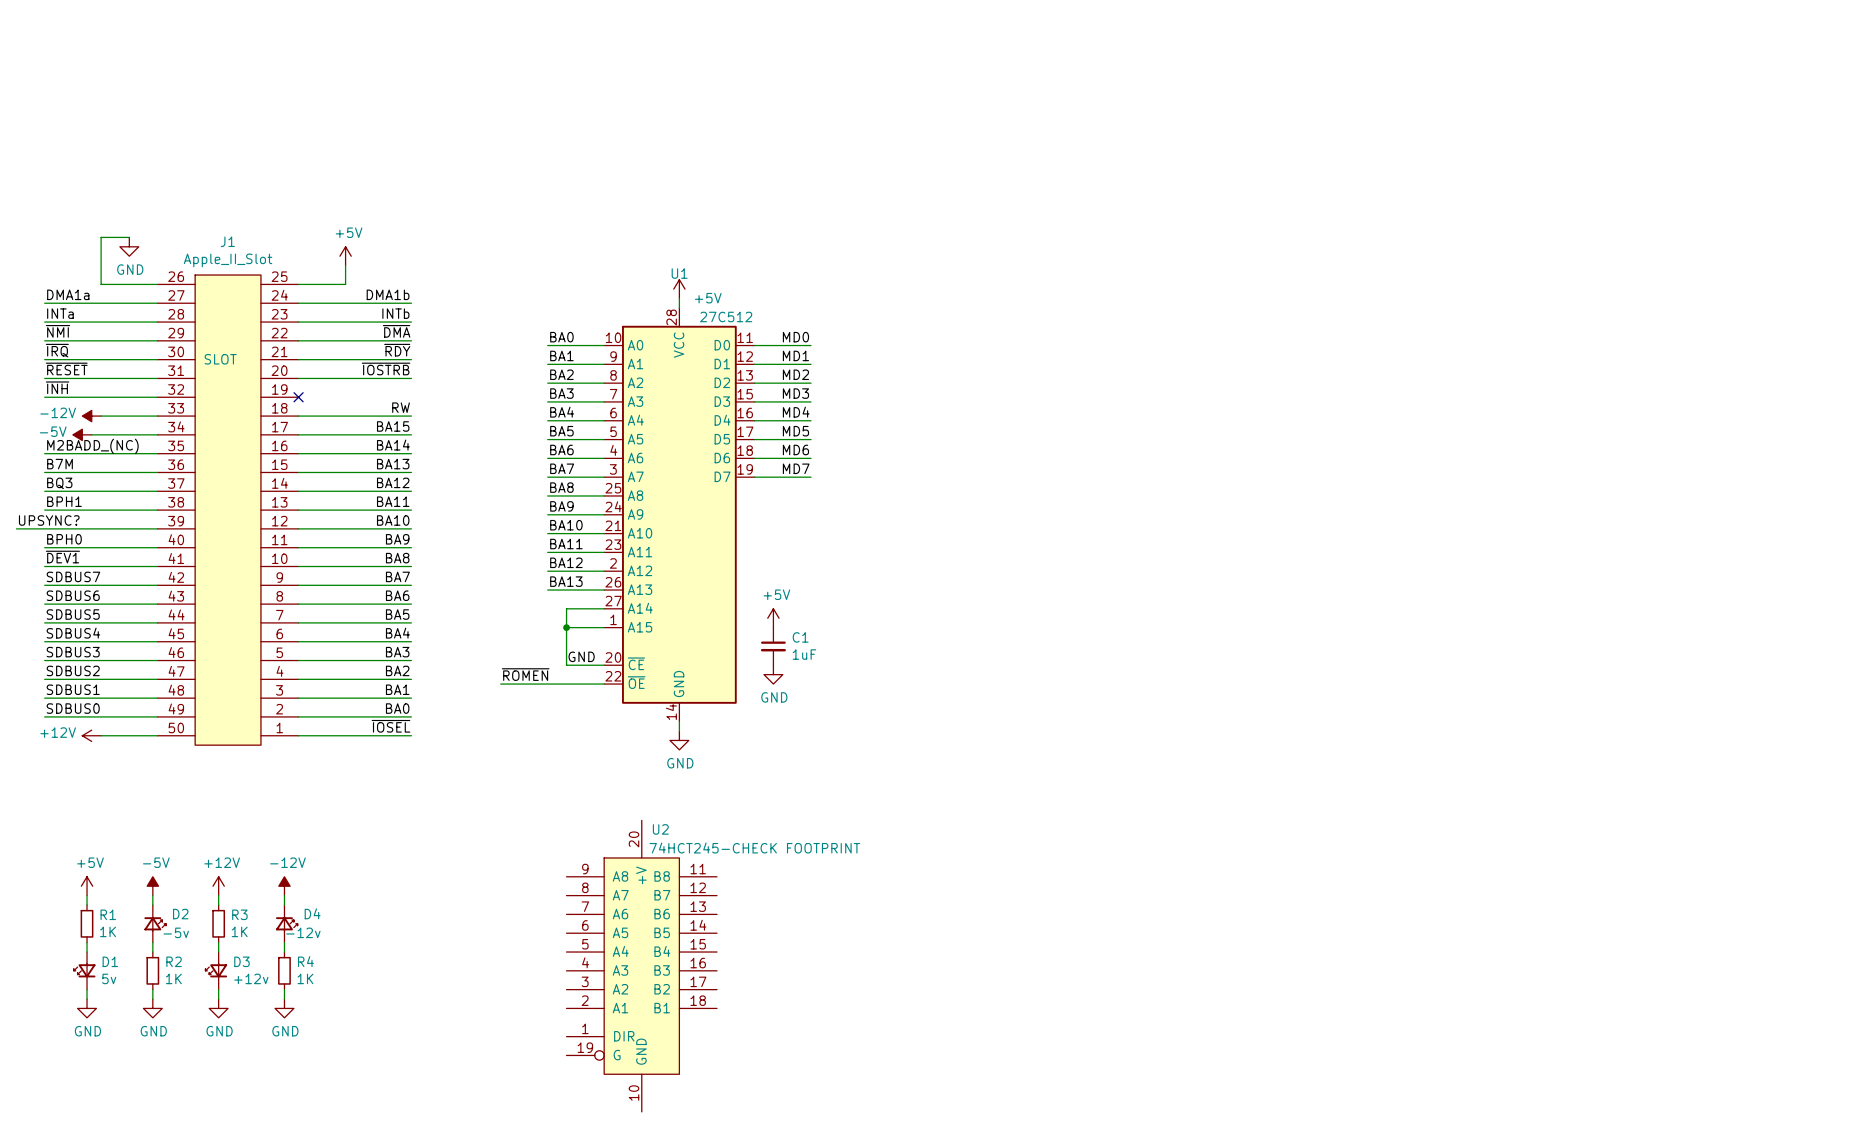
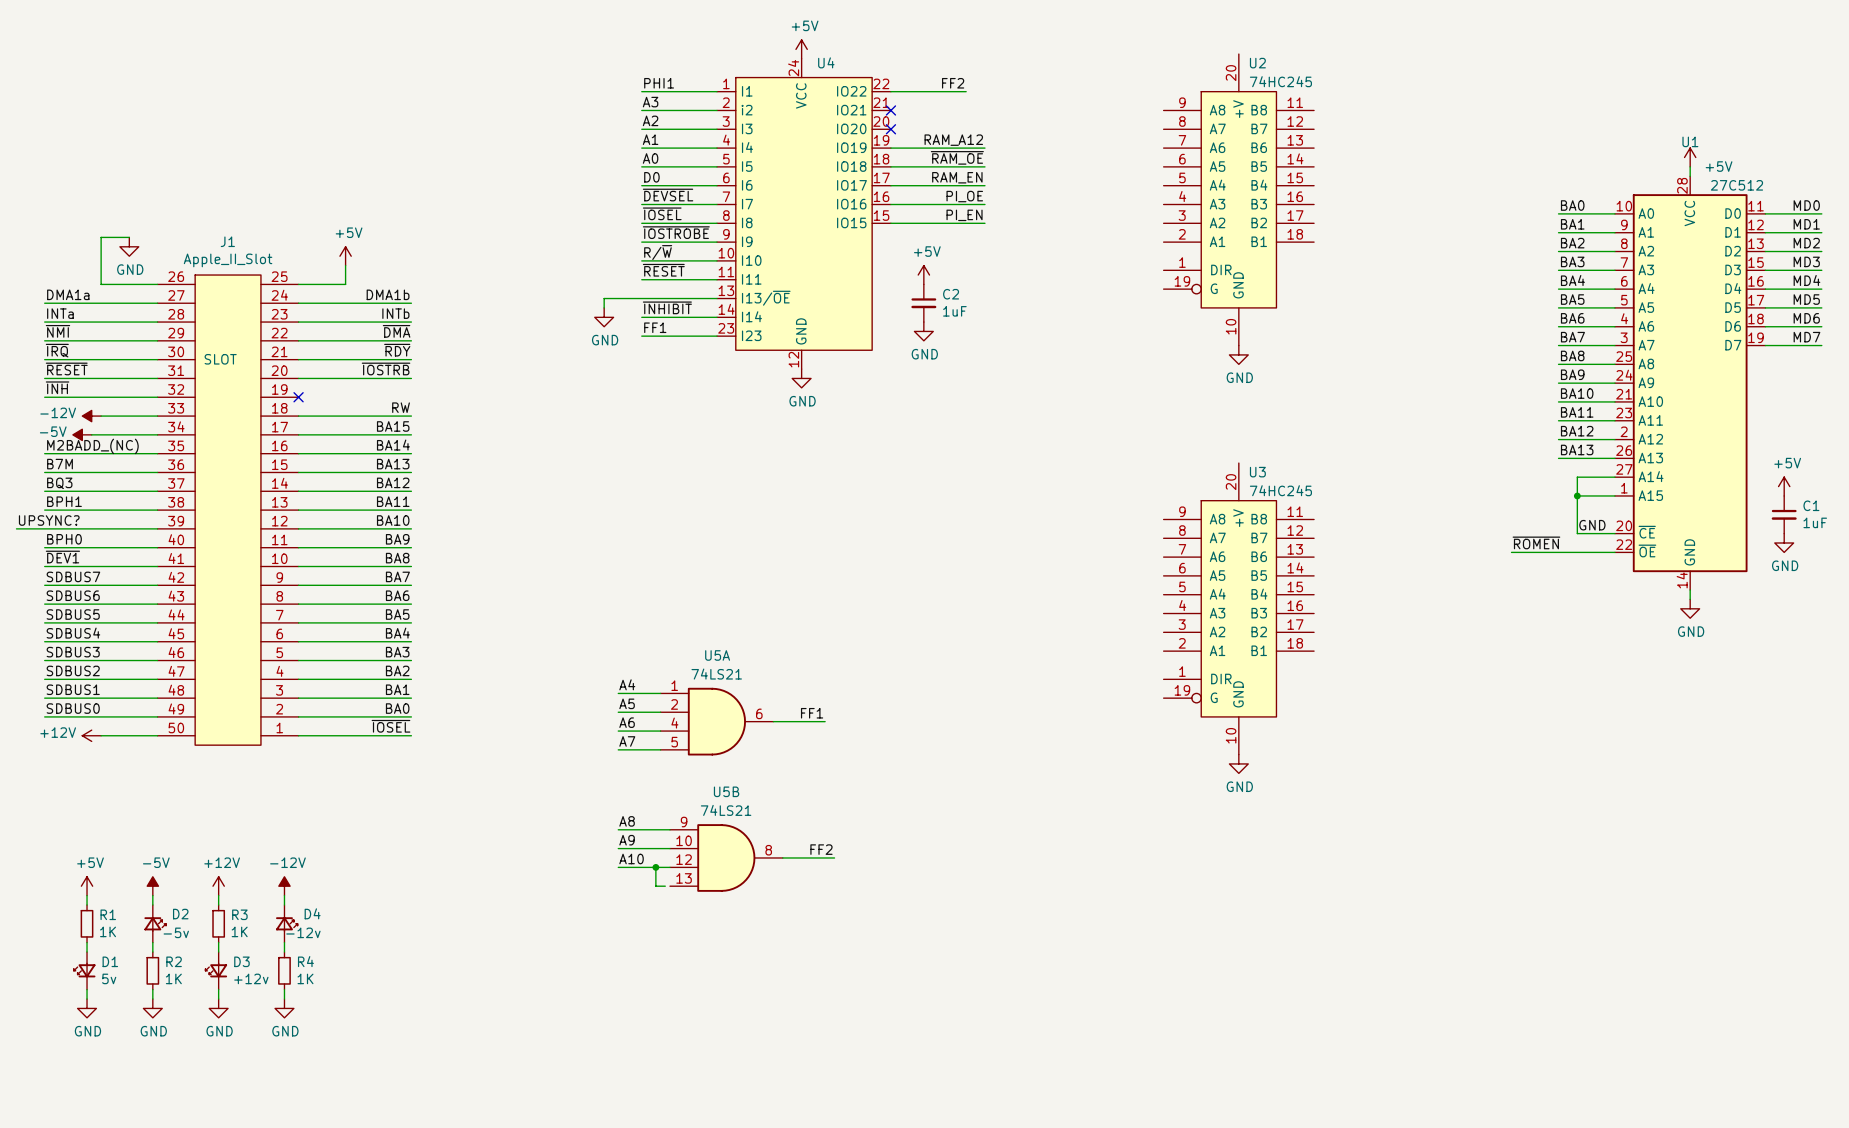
power symbol: none -> +5V (801, 49)
label: none -> PHI1 (659, 83)
label: none -> FF2 (953, 83)
wire: none -> (641, 91) (716, 91)
wire: none -> (890, 91) (966, 91)
label: none -> A3 (650, 102)
wire: none -> (641, 110) (716, 110)
no-connect mark: none -> (890, 110)
label: none -> A2 (650, 120)
wire: none -> (641, 129) (716, 129)
no-connect mark: none -> (890, 129)
label: none -> A1 (650, 139)
label: none -> RAM_A12 (953, 140)
wire: none -> (641, 148) (716, 148)
wire: none -> (890, 148) (984, 148)
label: none -> ~{RAM_OE} (957, 157)
power symbol: none -> +5V (1690, 157)
label: none -> A0 (650, 158)
wire: none -> (641, 166) (716, 166)
wire: none -> (890, 166) (984, 166)
wire: none -> (1690, 166) (1690, 176)
label: none -> D0 (651, 177)
label: none -> RAM_EN (957, 177)
wire: none -> (641, 185) (716, 185)
wire: none -> (890, 185) (984, 185)
label: none -> ~{DEVSEL} (668, 195)
label: none -> PI_OE (964, 196)
wire: none -> (641, 204) (716, 204)
wire: none -> (890, 204) (984, 204)
label: none -> BA0 (1572, 205)
label: none -> MD0 (1806, 205)
label: none -> ~{IOSEL} (662, 213)
U4: none -> (803, 213)
wire: none -> (1558, 213) (1614, 213)
wire: none -> (1765, 213) (1821, 213)
label: none -> PI_EN (964, 215)
wire: none -> (641, 223) (716, 223)
wire: none -> (890, 223) (984, 223)
label: none -> BA1 (1572, 224)
label: none -> MD1 (1806, 224)
label: none -> ~{IOSTROBE} (676, 232)
wire: none -> (1558, 232) (1614, 232)
wire: none -> (1765, 232) (1821, 232)
wire: none -> (641, 242) (716, 242)
label: none -> BA2 (1572, 243)
label: none -> MD2 (1806, 243)
wire: none -> (1558, 251) (1614, 251)
wire: none -> (1765, 251) (1821, 251)
label: none -> R/~{W} (658, 252)
wire: none -> (641, 260) (716, 260)
label: none -> BA3 (1572, 261)
label: none -> MD3 (1806, 261)
label: none -> ~{RESET} (663, 270)
wire: none -> (1558, 270) (1614, 270)
wire: none -> (1765, 270) (1821, 270)
power symbol: none -> +5V (923, 275)
wire: none -> (641, 279) (716, 279)
label: none -> BA4 (1572, 280)
label: none -> MD4 (1806, 280)
power symbol: +5V (679, 289) -> none
wire: none -> (1558, 289) (1614, 289)
wire: none -> (1765, 289) (1821, 289)
wire: (679, 298) (679, 307) -> none
wire: none -> (716, 298) (604, 298) (604, 307)
label: none -> BA5 (1572, 299)
label: none -> MD5 (1806, 299)
C2: none -> 1uF (923, 303)
label: none -> ~{INHIBIT} (667, 307)
wire: none -> (1558, 307) (1614, 307)
wire: none -> (1765, 307) (1821, 307)
power symbol: none -> GND (604, 317)
wire: none -> (641, 317) (716, 317)
label: none -> BA6 (1572, 318)
label: none -> MD6 (1806, 318)
wire: none -> (1558, 326) (1614, 326)
wire: none -> (1765, 326) (1821, 326)
label: none -> FF1 (655, 327)
power symbol: none -> GND (923, 331)
label: BA0 (561, 337) -> none
label: MD0 (795, 337) -> none
label: none -> BA7 (1572, 337)
label: none -> MD7 (1806, 337)
wire: (547, 345) (604, 345) -> none
wire: none -> (1558, 345) (1614, 345)
wire: none -> (1765, 345) (1821, 345)
power symbol: none -> GND (1238, 354)
label: BA1 (561, 355) -> none
label: MD1 (795, 355) -> none
label: none -> BA8 (1572, 355)
wire: (547, 364) (604, 364) -> none
wire: (754, 364) (811, 364) -> none
wire: none -> (1558, 364) (1614, 364)
label: BA2 (561, 374) -> none
label: MD2 (795, 374) -> none
label: none -> BA9 (1572, 374)
power symbol: none -> GND (801, 378)
wire: (547, 383) (604, 383) -> none
wire: (754, 383) (811, 383) -> none
wire: none -> (1558, 383) (1614, 383)
label: BA3 (561, 393) -> none
label: MD3 (795, 393) -> none
label: none -> BA10 (1577, 393)
wire: (547, 401) (604, 401) -> none
wire: (754, 401) (811, 401) -> none
wire: none -> (1558, 401) (1614, 401)
label: BA4 (562, 412) -> none
label: MD4 (796, 412) -> none
label: none -> BA11 (1577, 412)
wire: (547, 420) (604, 420) -> none
wire: (754, 420) (811, 420) -> none
wire: none -> (1558, 420) (1614, 420)
label: BA5 (561, 431) -> none
label: MD5 (795, 431) -> none
label: none -> BA12 (1577, 431)
wire: (547, 439) (604, 439) -> none
wire: (754, 439) (811, 439) -> none
wire: none -> (1558, 439) (1614, 439)
label: BA6 (561, 449) -> none
label: MD6 (795, 449) -> none
label: none -> BA13 (1577, 449)
wire: (547, 458) (604, 458) -> none
wire: (754, 458) (811, 458) -> none
wire: none -> (1558, 458) (1614, 458)
label: BA7 (562, 468) -> none
label: MD7 (796, 468) -> none
wire: (547, 477) (604, 477) -> none
wire: (754, 477) (811, 477) -> none
wire: none -> (1614, 477) (1577, 477) (1577, 533) (1614, 533)
power symbol: none -> +5V (1784, 486)
label: BA8 (561, 487) -> none
wire: (547, 495) (604, 495) -> none
wire: none -> (1577, 495) (1614, 495)
junction: none -> (1577, 495)
label: BA9 (561, 506) -> none
wire: (547, 514) (604, 514) -> none
U1 position: (679, 514) -> (1690, 383)
label: BA10 (566, 525) -> none
label: none -> GND (1592, 525)
wire: (547, 533) (604, 533) -> none
label: none -> ~{ROMEN} (1536, 542)
power symbol: none -> GND (1784, 543)
label: BA11 (566, 544) -> none
wire: (547, 552) (604, 552) -> none
wire: none -> (1511, 552) (1614, 552)
label: BA12 (566, 562) -> none
wire: (547, 571) (604, 571) -> none
label: BA13 (566, 581) -> none
wire: (547, 590) (604, 590) -> none
wire: none -> (1690, 590) (1690, 599)
wire: (604, 608) (566, 608) (566, 665) (604, 665) -> none
U3: none -> 74HC245 (1238, 608)
power symbol: none -> GND (1690, 608)
power symbol: +5V (773, 618) -> none
wire: (566, 627) (604, 627) -> none
junction: (566, 627) -> none
C1 position: (773, 646) -> (1784, 514)
label: GND (581, 656) -> none
label: ~{ROMEN} (525, 674) -> none
power symbol: GND (773, 674) -> none
wire: (500, 684) (604, 684) -> none
label: none -> A4 (627, 684)
label: none -> A5 (627, 703)
wire: none -> (618, 712) (660, 712)
label: none -> FF1 (812, 713)
wire: (679, 721) (679, 731) -> none
U5A: none -> 74LS21 (716, 721)
wire: none -> (773, 721) (825, 721)
label: none -> A6 (627, 722)
wire: none -> (618, 731) (660, 731)
power symbol: GND (679, 740) -> none
label: none -> A7 (627, 741)
wire: none -> (618, 749) (660, 749)
power symbol: none -> GND (1238, 763)
label: none -> A8 (627, 821)
wire: none -> (618, 829) (669, 829)
label: none -> A9 (627, 840)
wire: none -> (618, 848) (669, 848)
U2 value: 74HCT245-CHECK FOOTPRINT (754, 848) -> 74HC245 (1280, 81)
label: none -> FF2 (821, 849)
U5B: none -> 74LS21 (726, 857)
wire: none -> (782, 857) (834, 857)
label: none -> A10 (631, 859)
junction: none -> (655, 867)
U2 position: (641, 966) -> (1238, 199)

